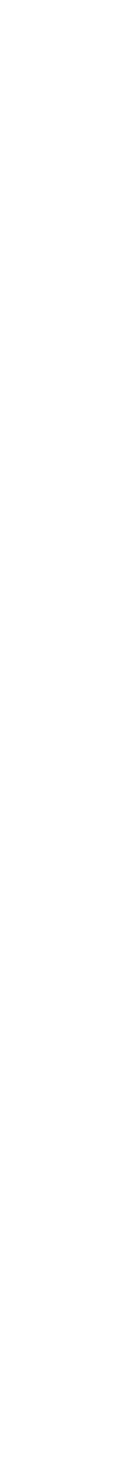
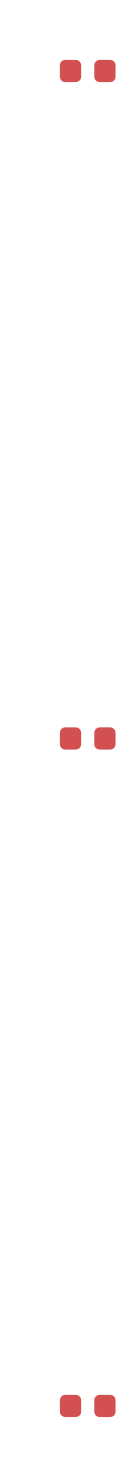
part: none -> (87, 70)
part: none -> (87, 738)
part: none -> (87, 1405)

